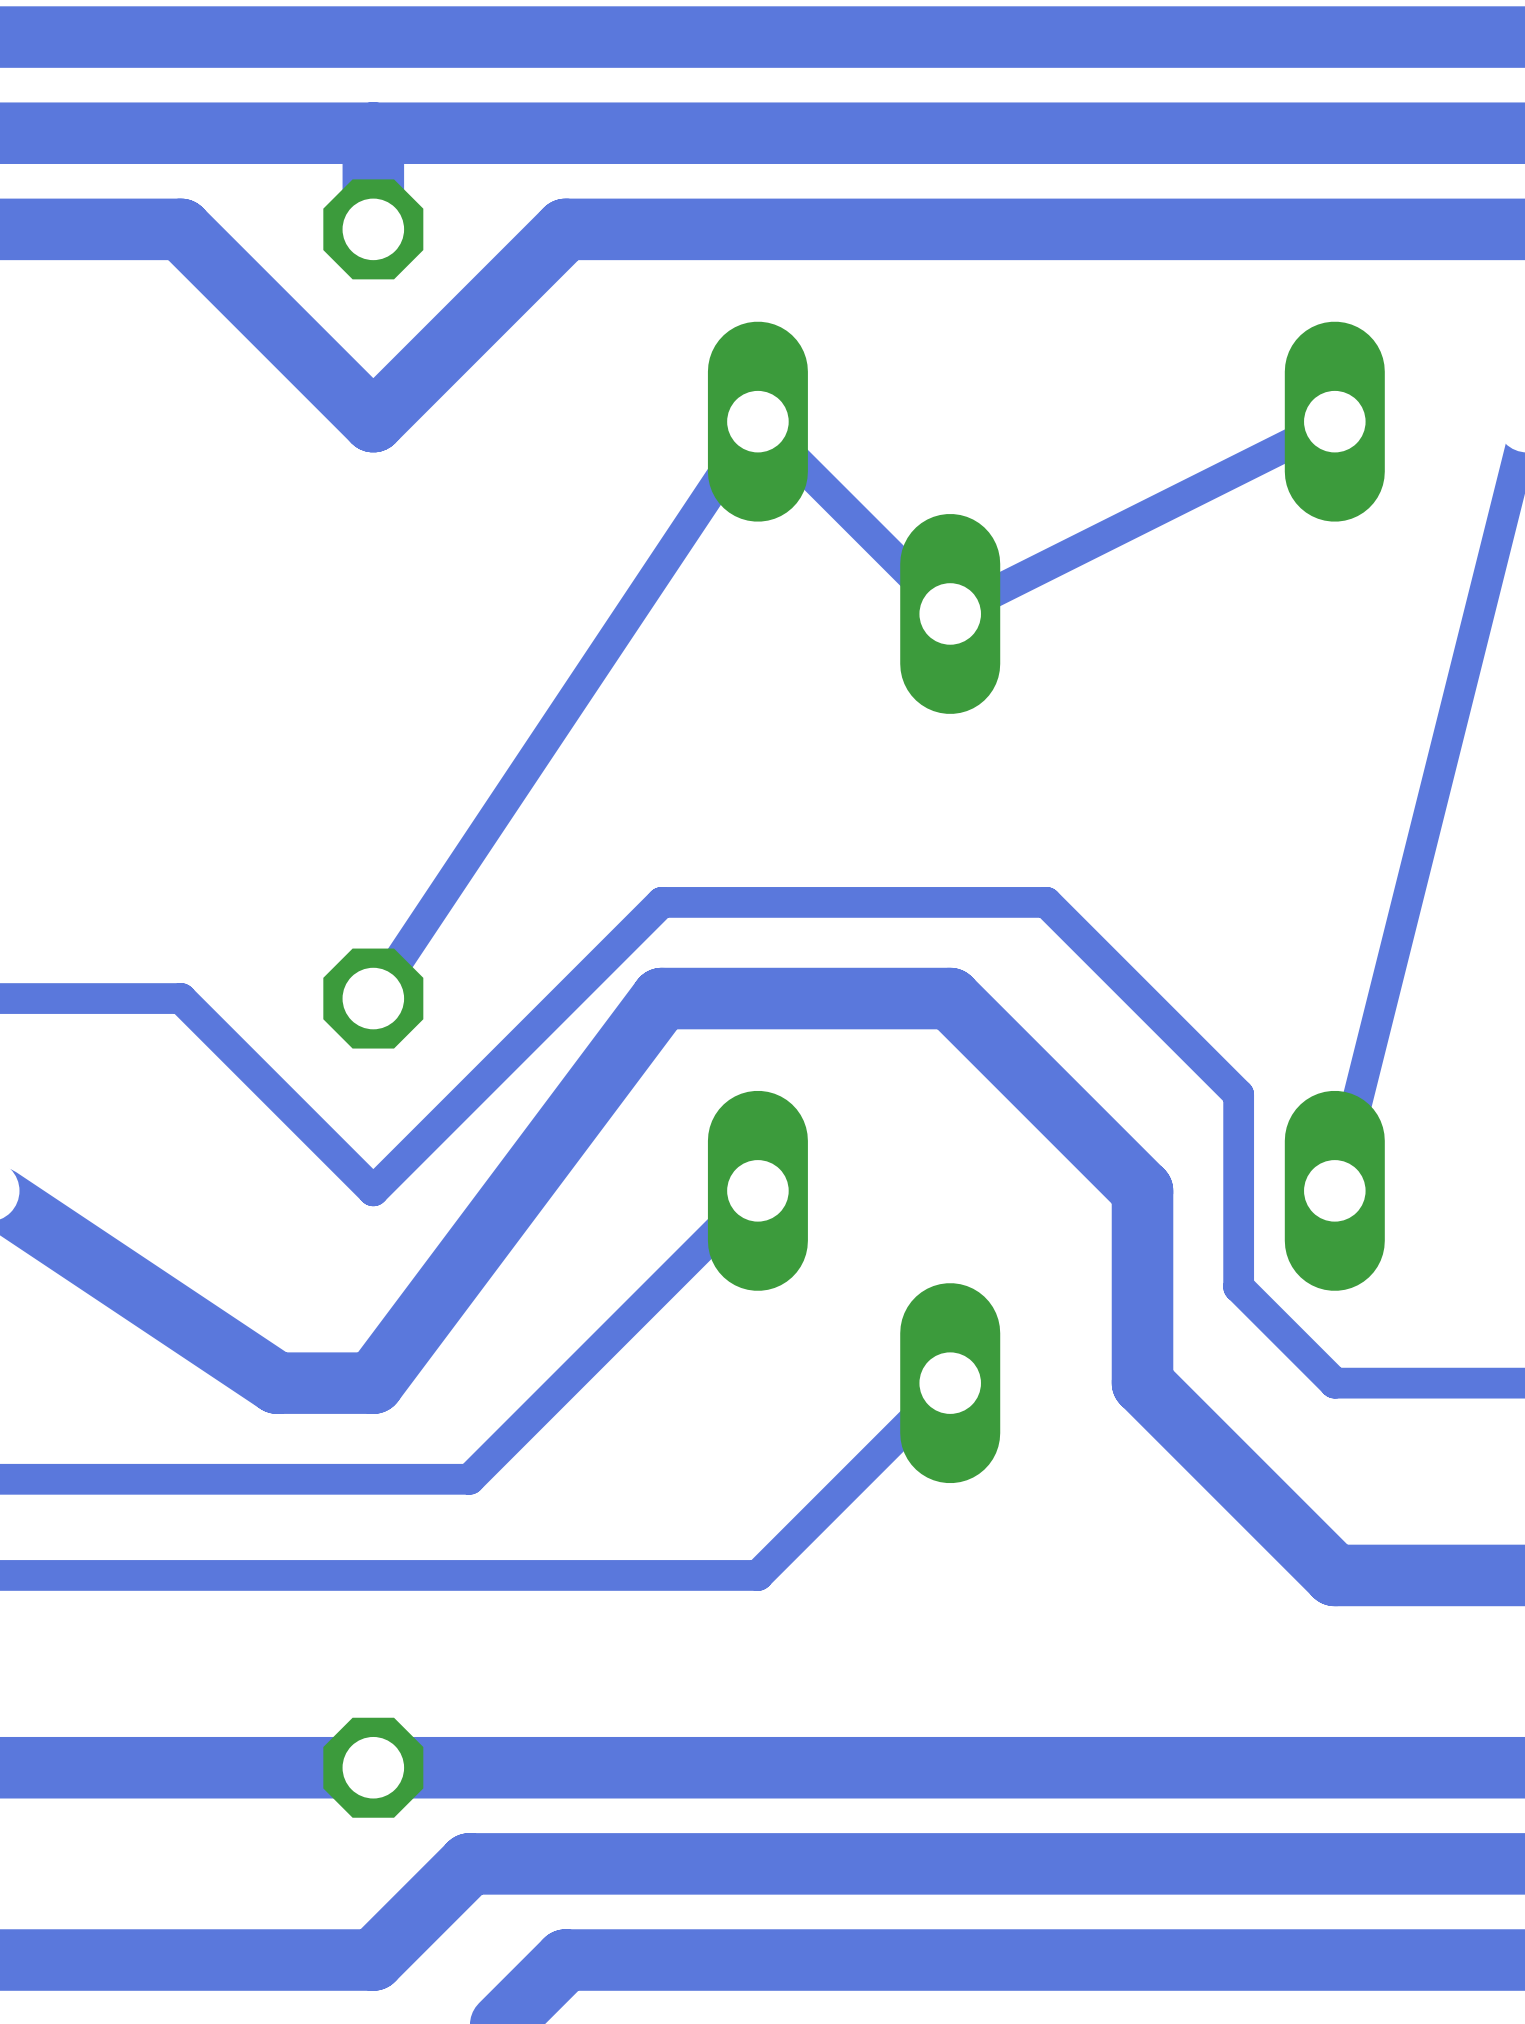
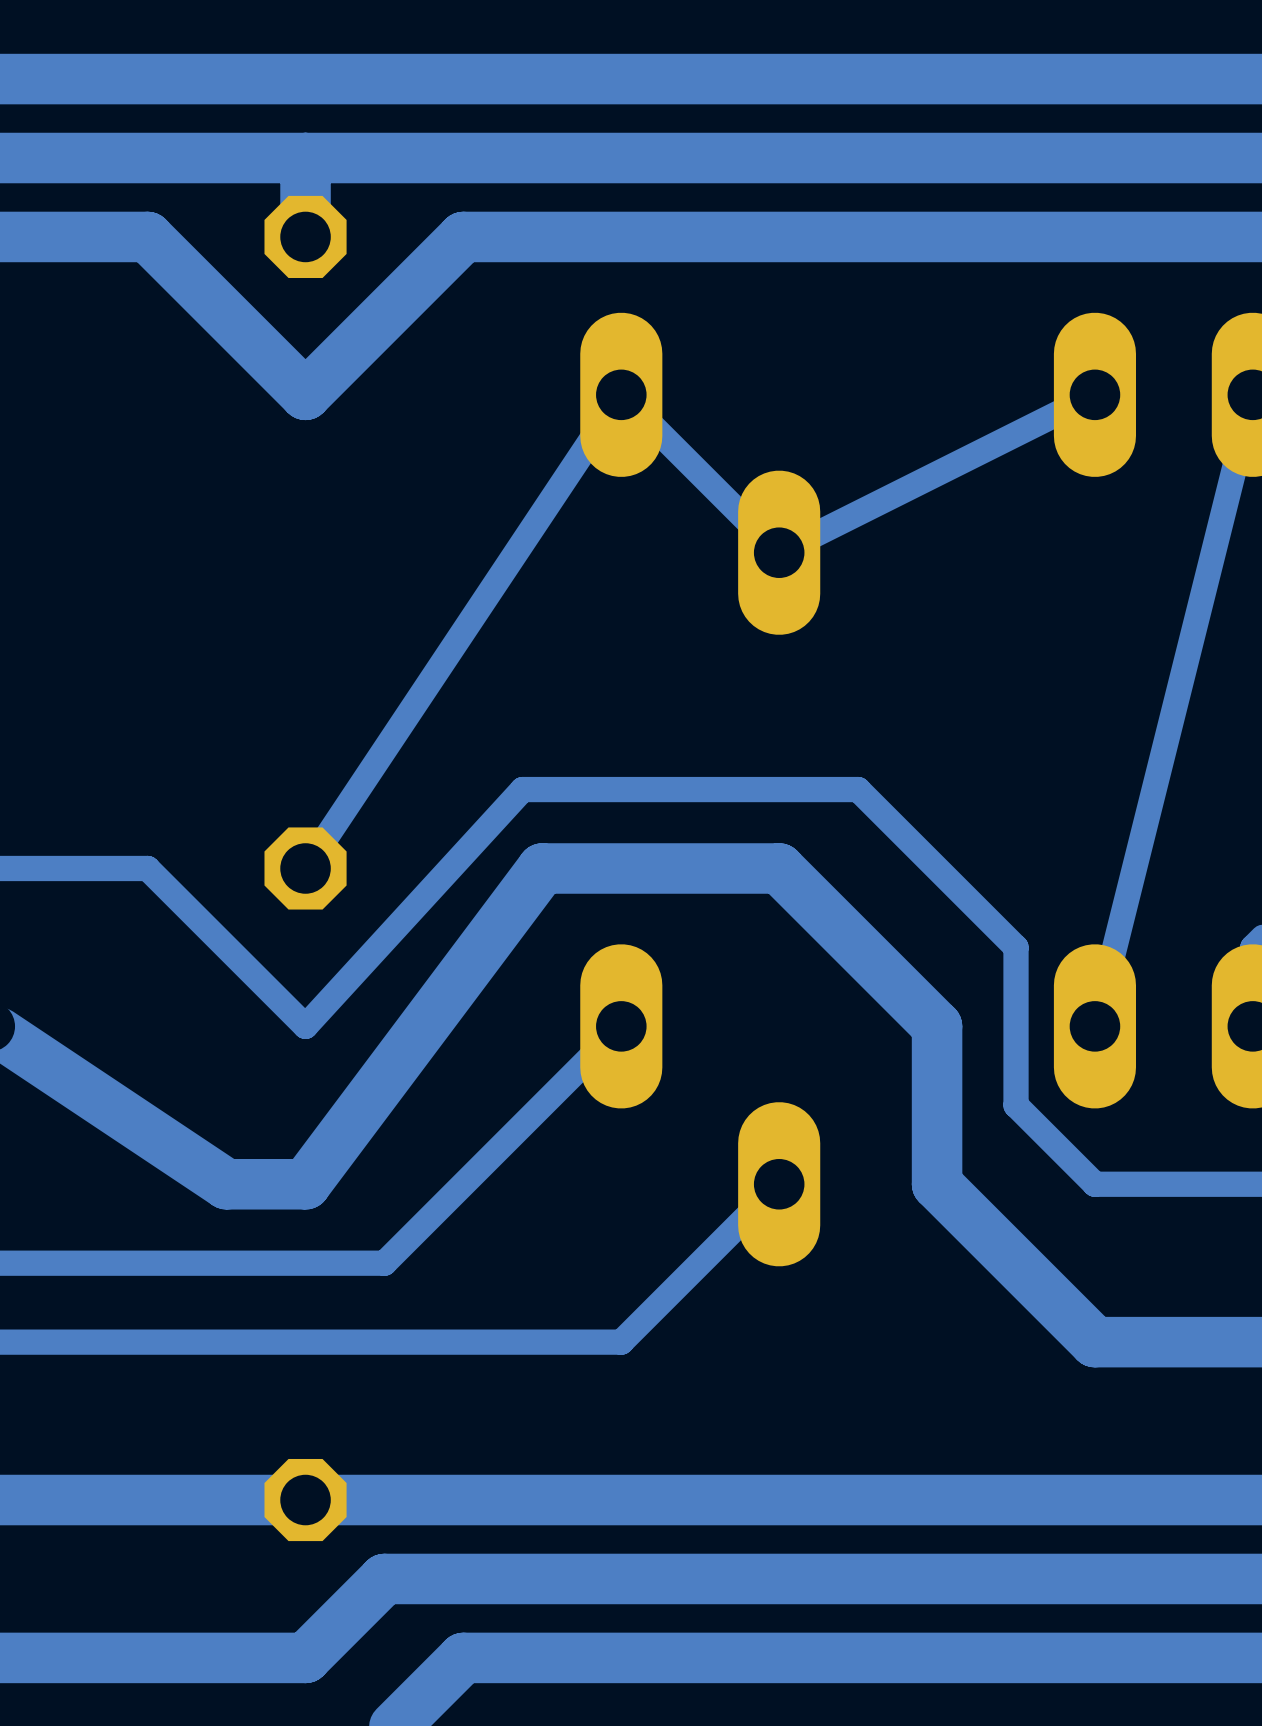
bottom track: (661, 902) (373, 1190) -> (542, 789) (522, 789) (305, 1026)

